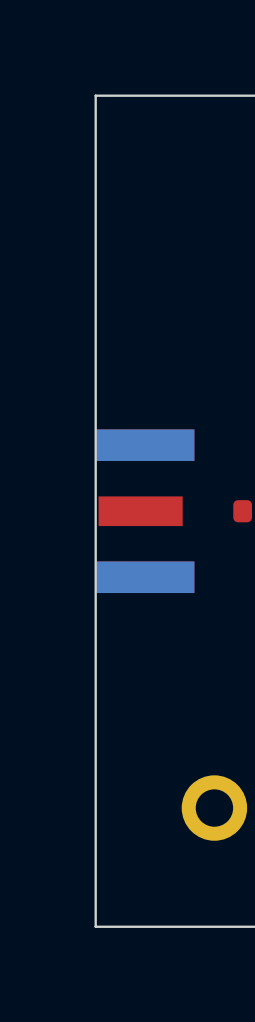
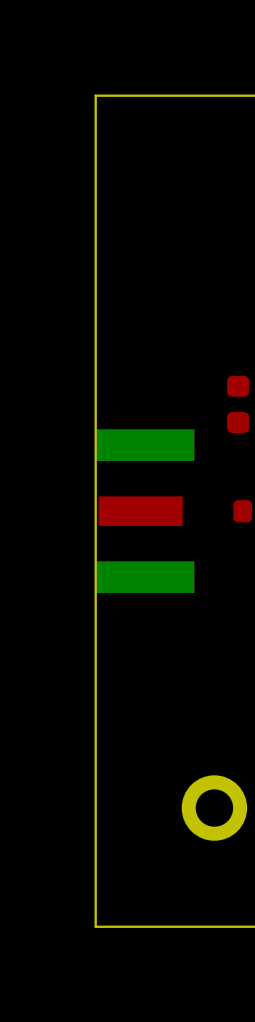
part: none -> (238, 404)

